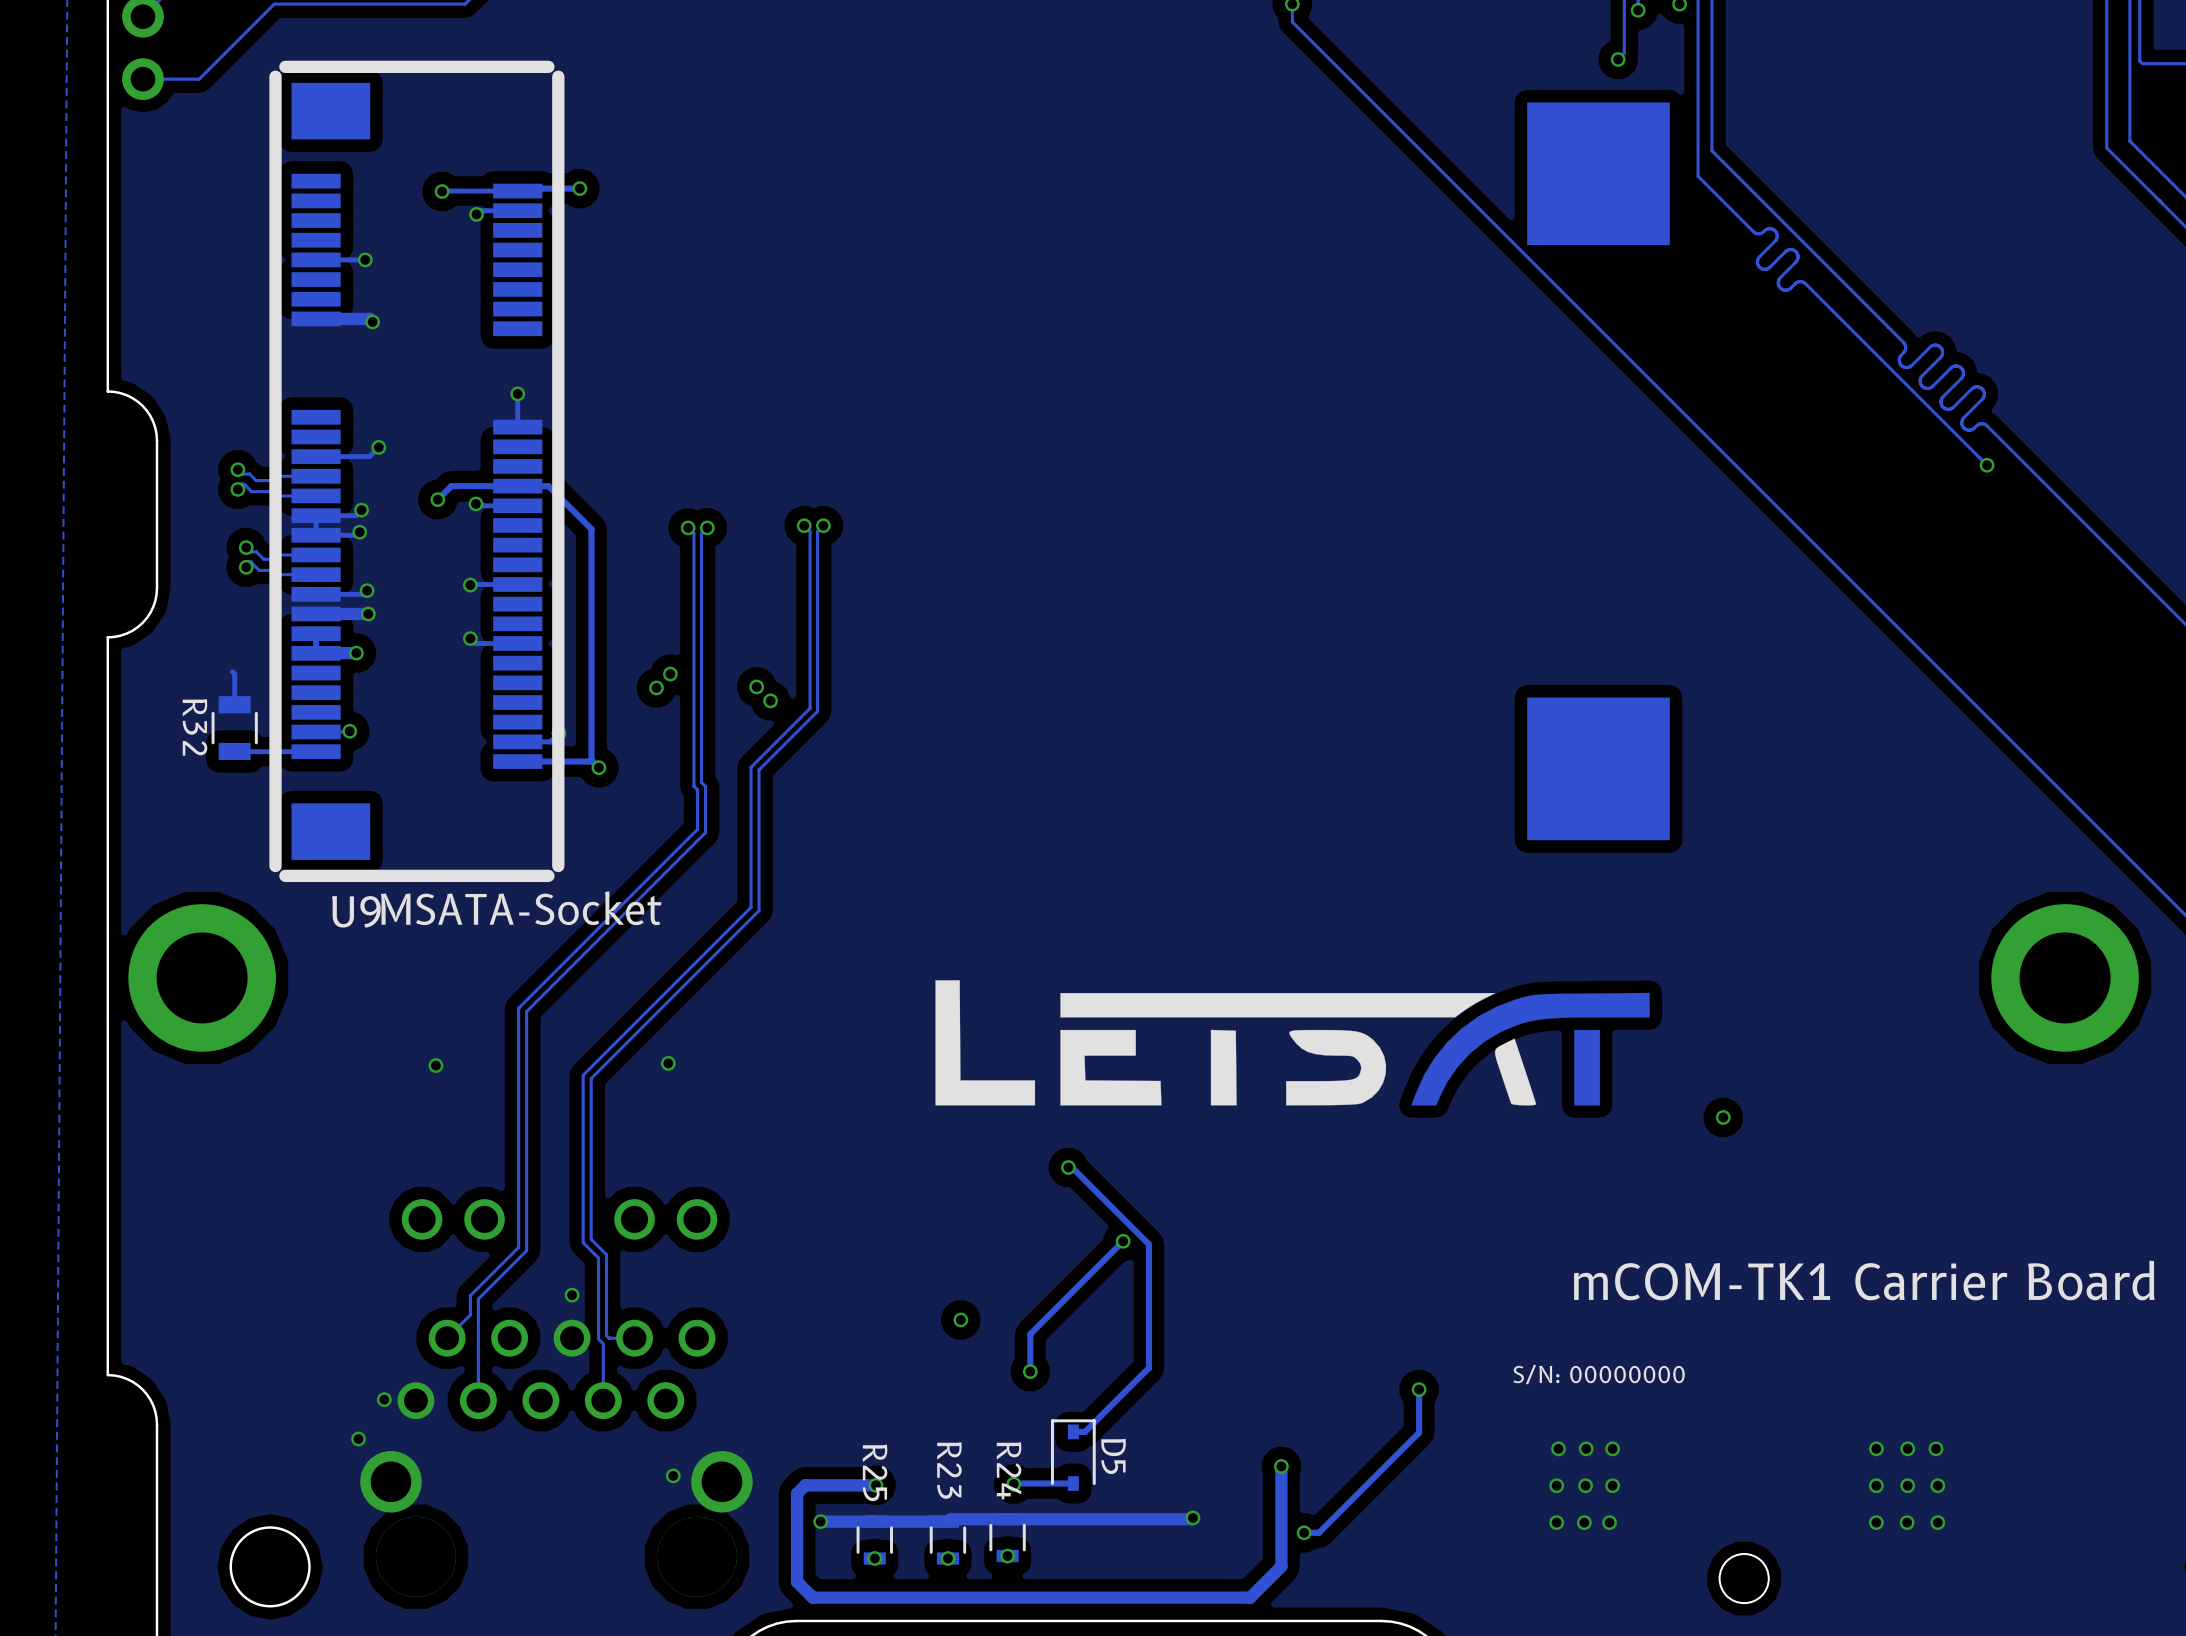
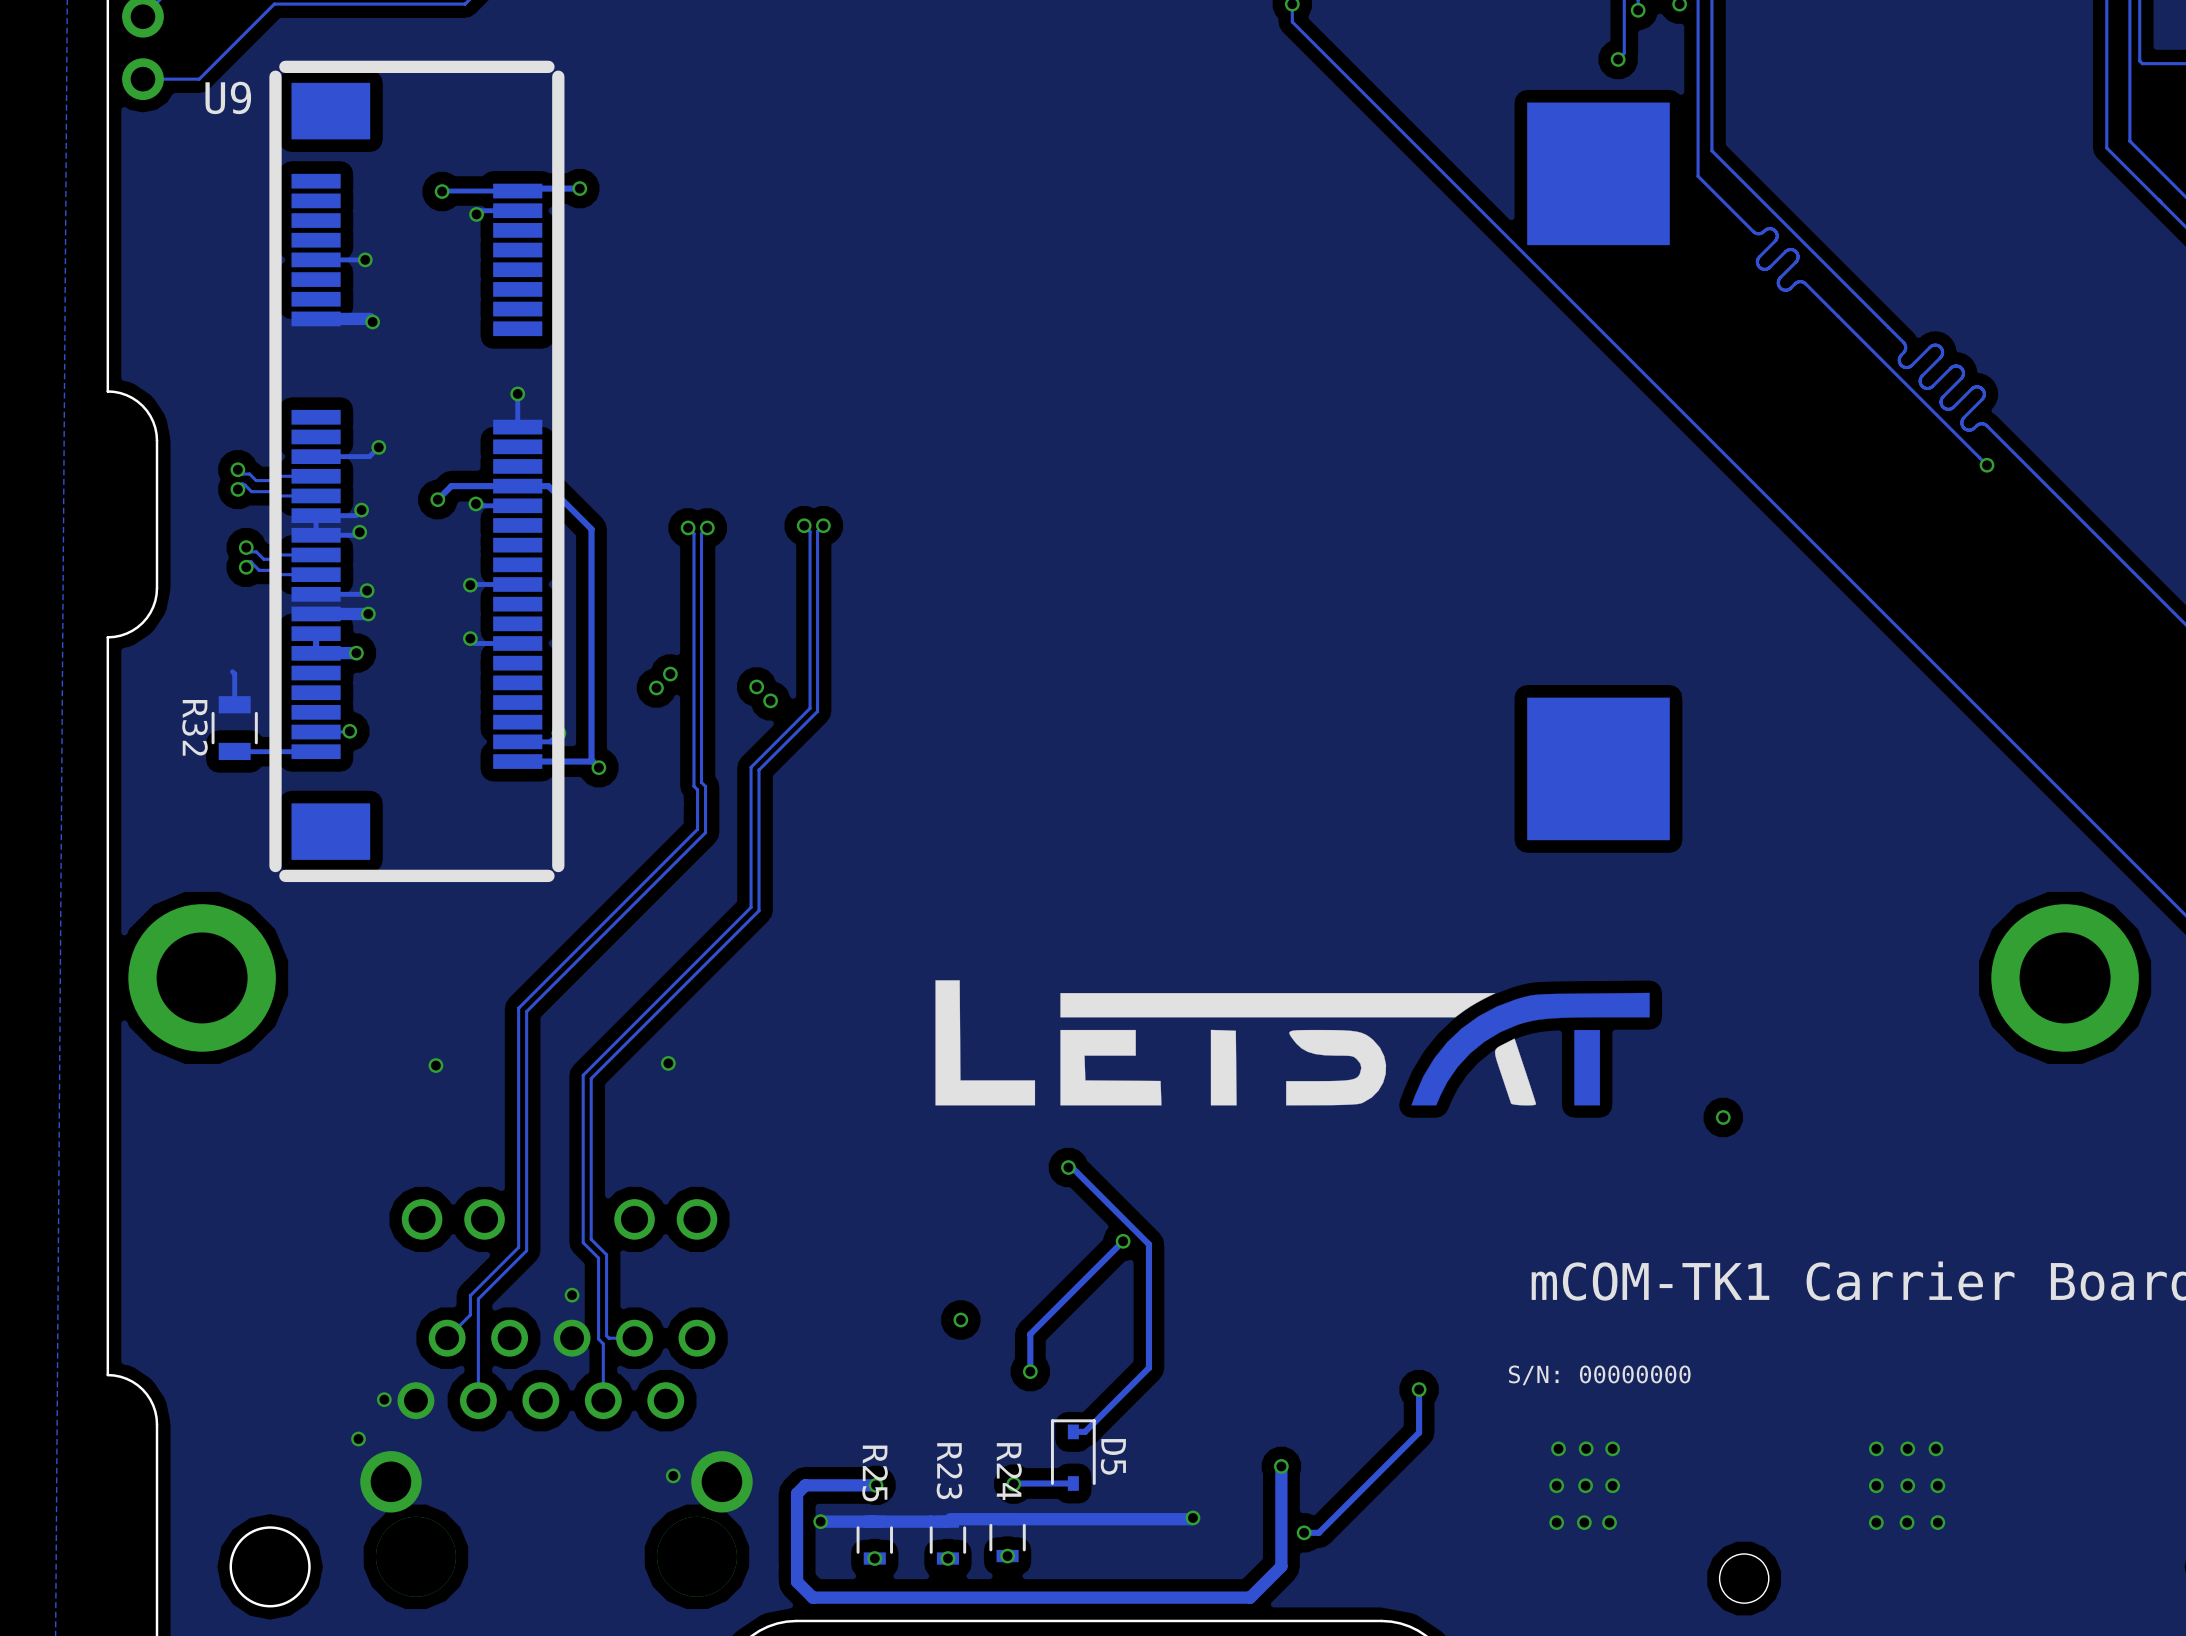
U9 value: MSATA-Socket (521, 908) -> none
U9 name position: U9 (356, 911) -> U9 (228, 97)

